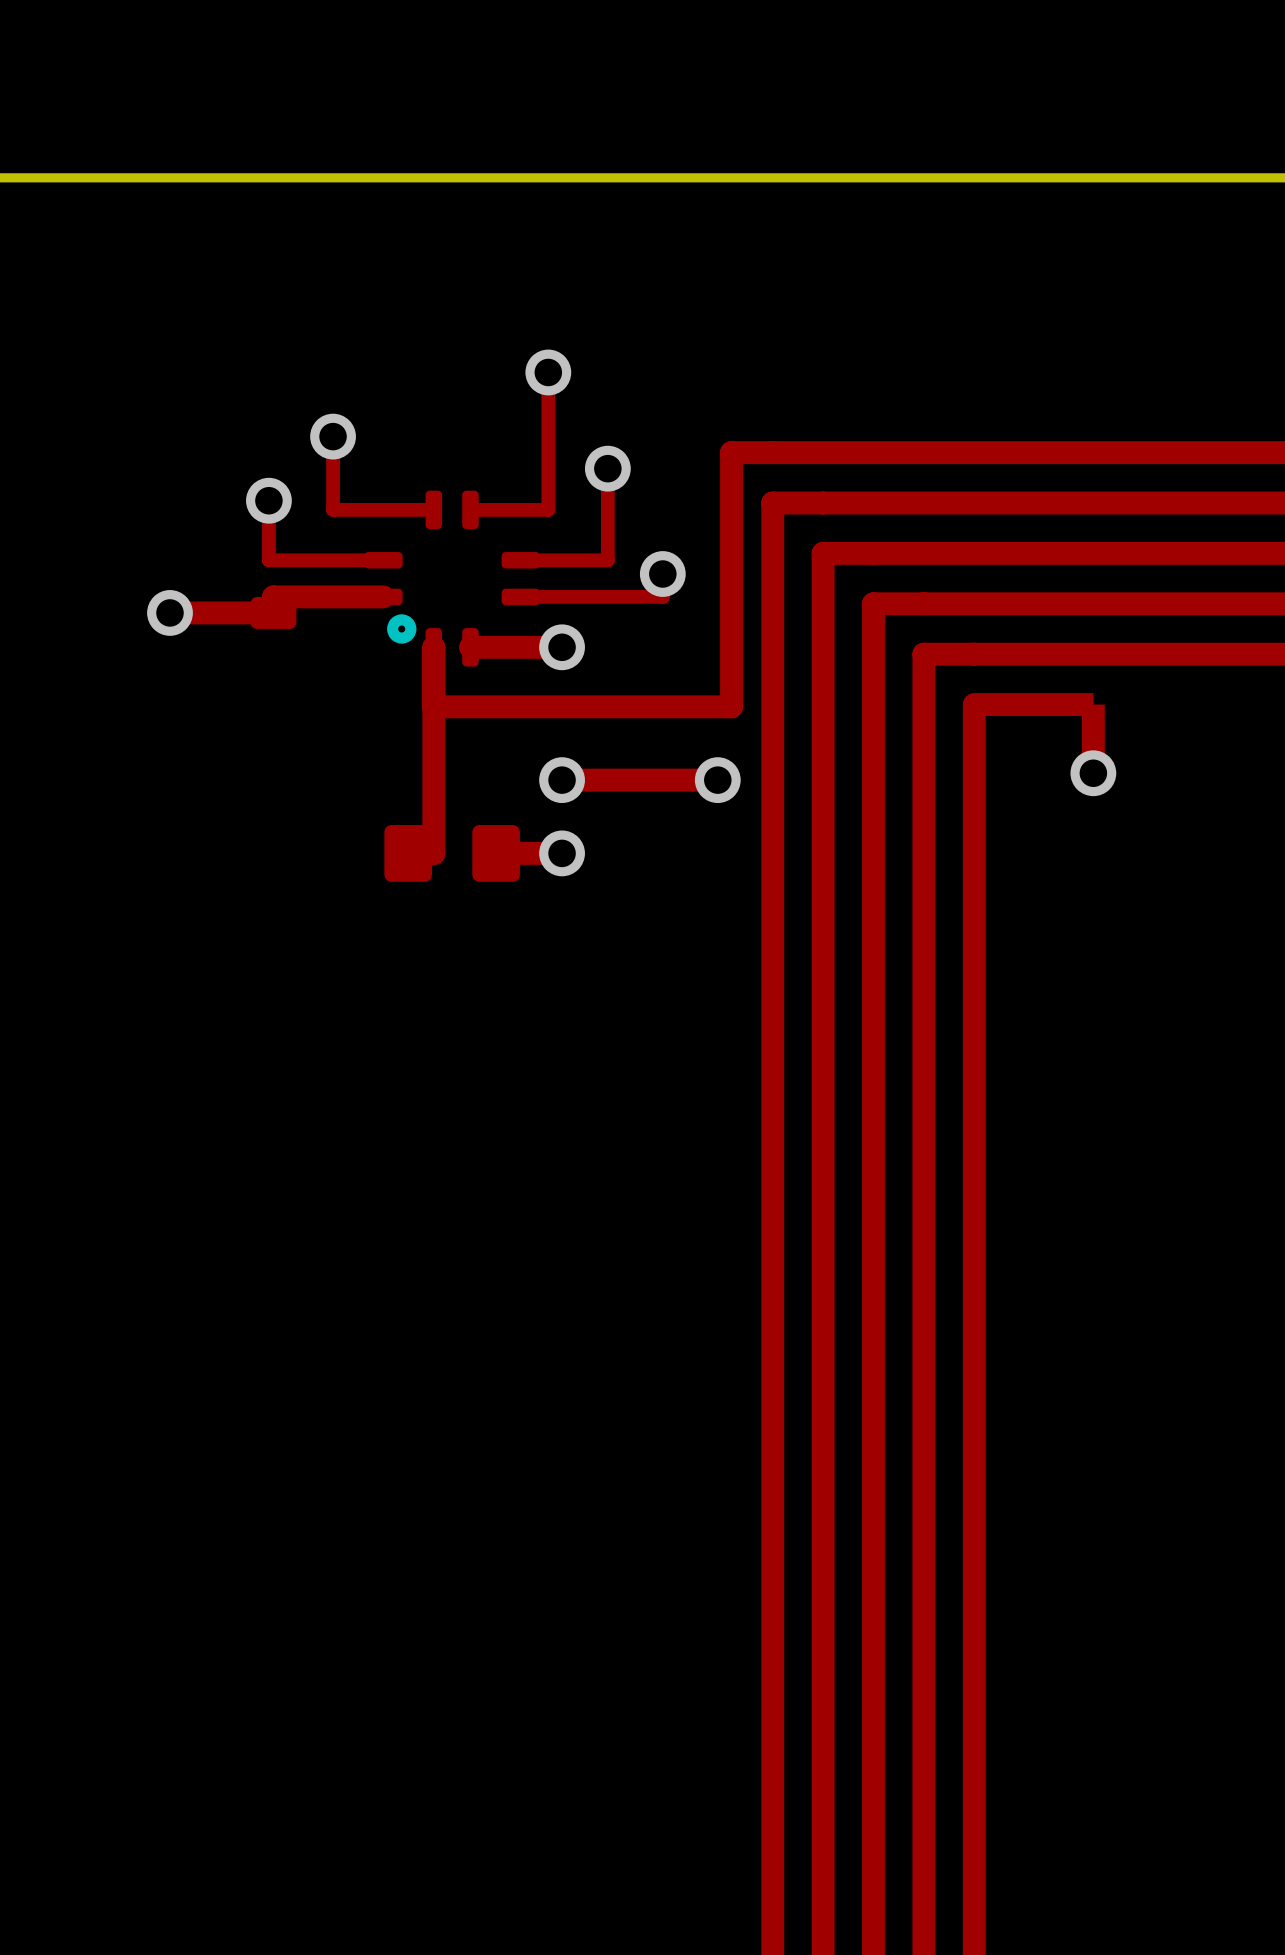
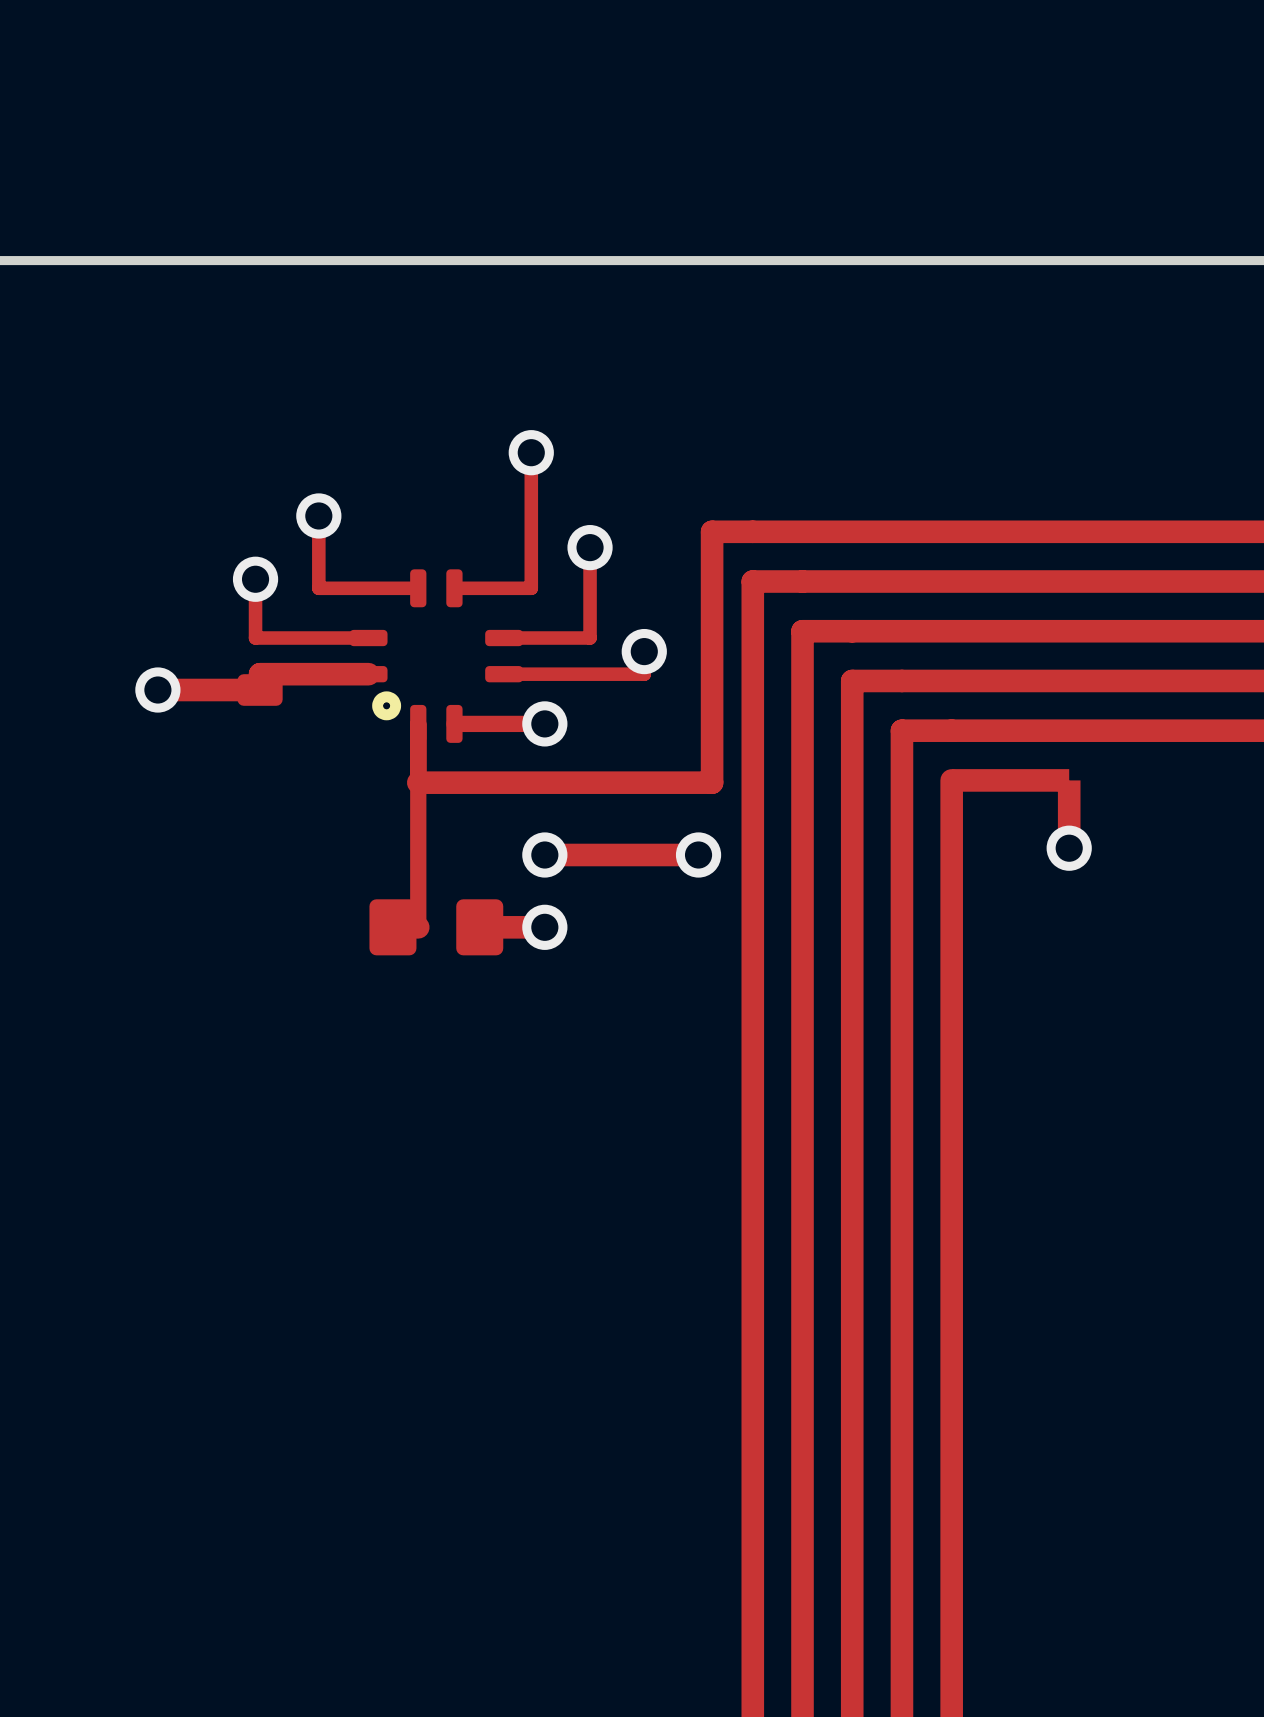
track width: thick (433, 647) (433, 853) -> thin (418, 723) (418, 927)
track width: thick (470, 647) (562, 647) -> thin (454, 723) (544, 723)

